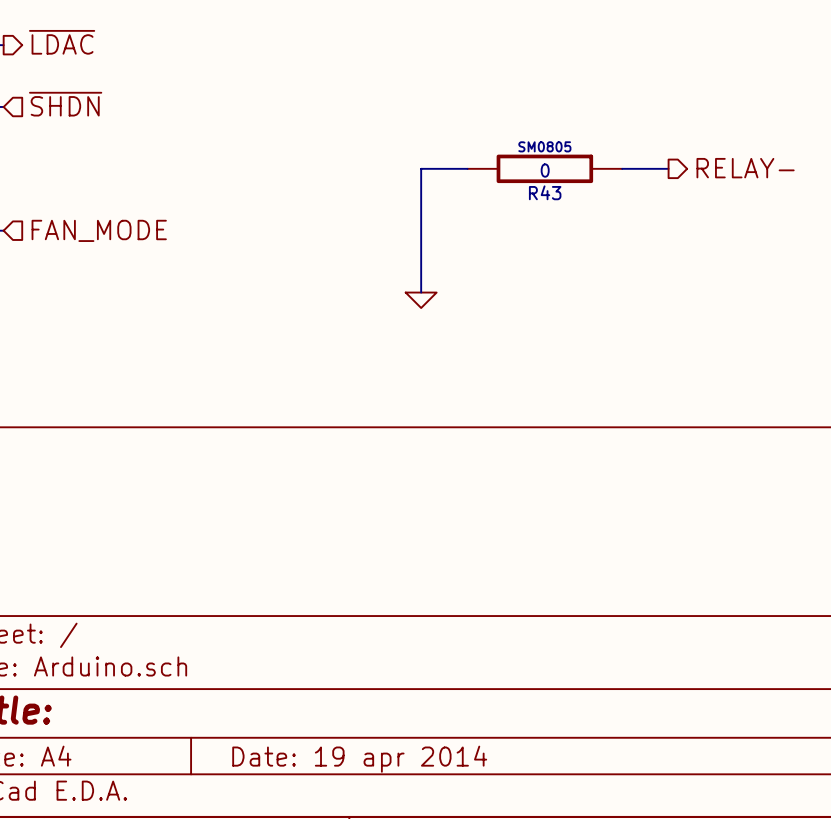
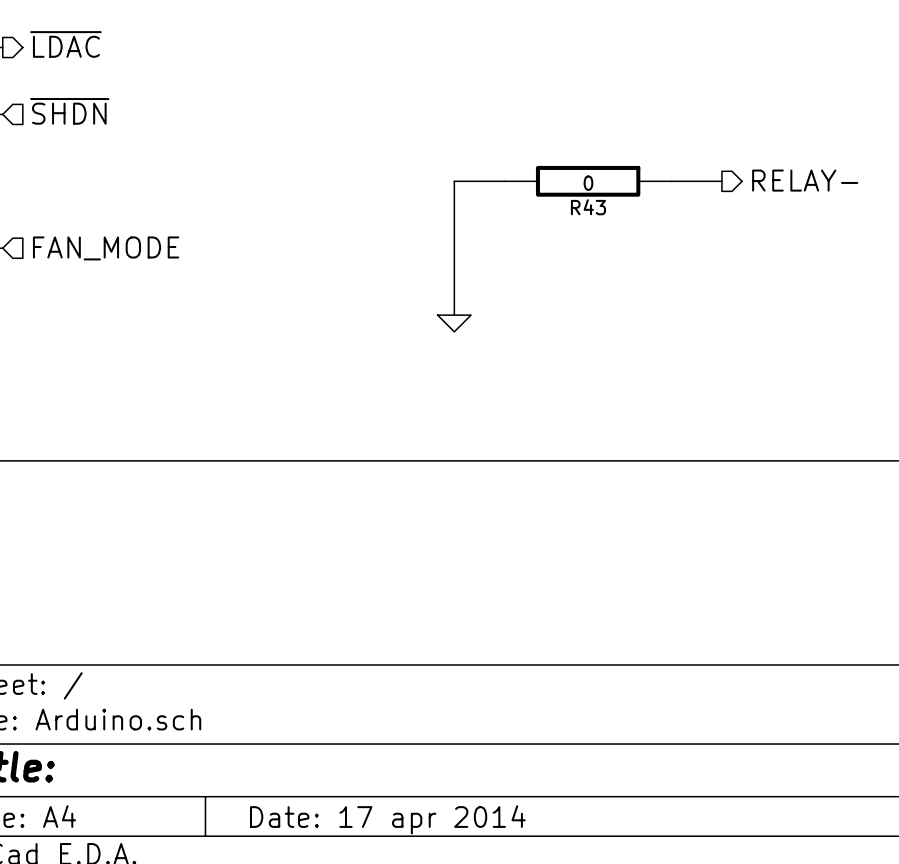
R43 text: SM0805 (544, 146) -> none
title block: Date: 19 apr 2014 (359, 759) -> Date: 17 apr 2014 (387, 819)

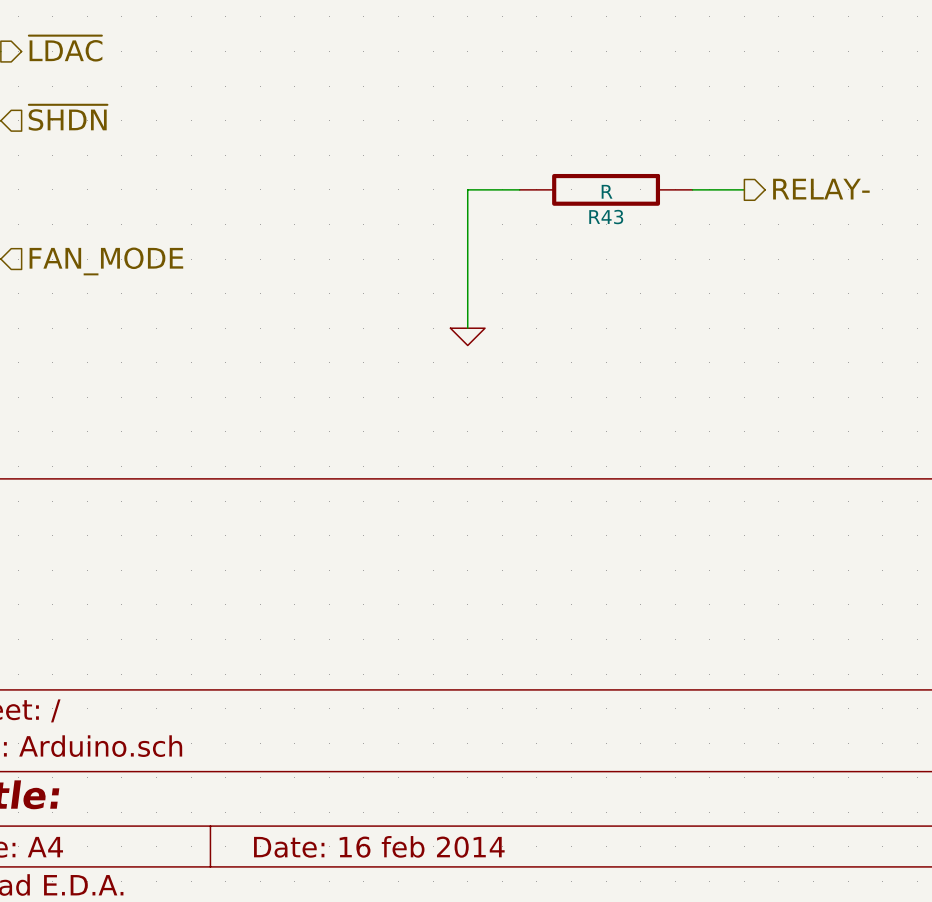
R43 value: 0 (588, 183) -> R (607, 191)
title block: Date: 17 apr 2014 (387, 819) -> Date: 16 feb 2014 (379, 846)

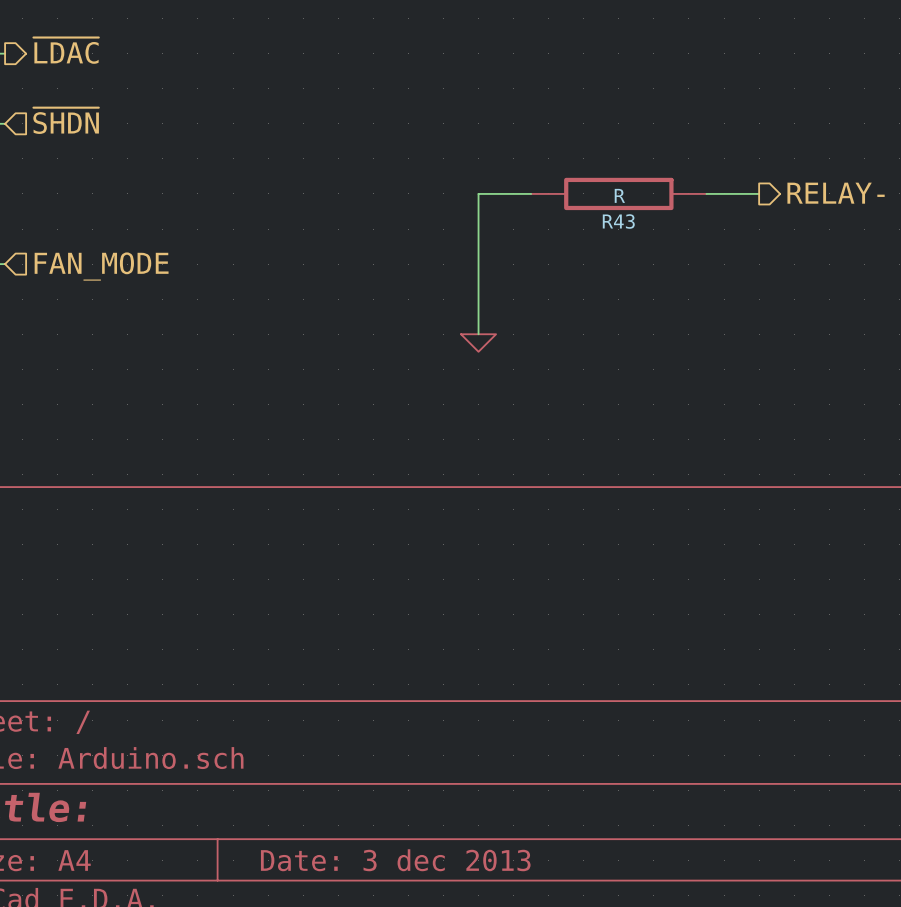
title block: Date: 16 feb 2014 (379, 846) -> Date: 3 dec 2013 (395, 860)

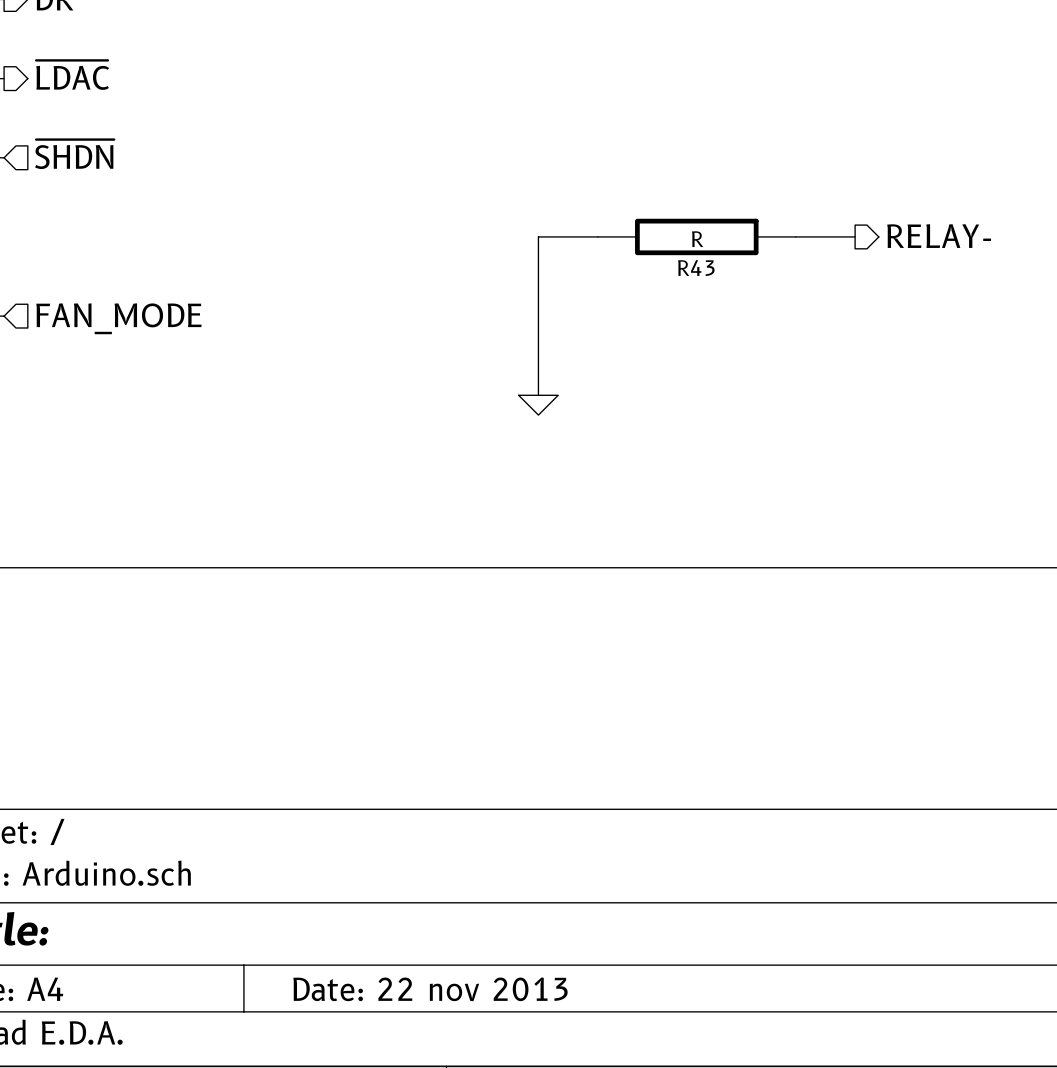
title block: Date: 3 dec 2013 (395, 860) -> Date: 22 nov 2013 (430, 989)

